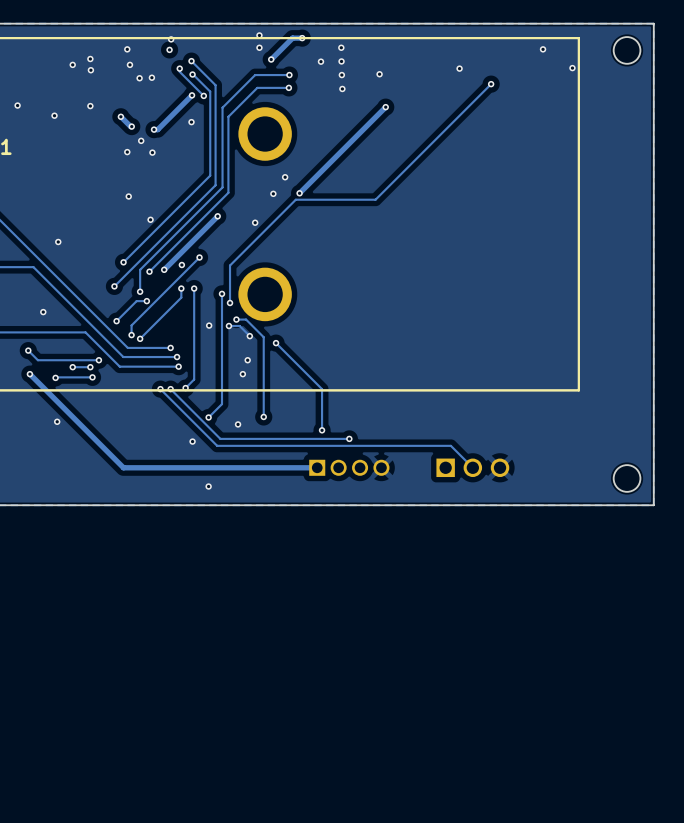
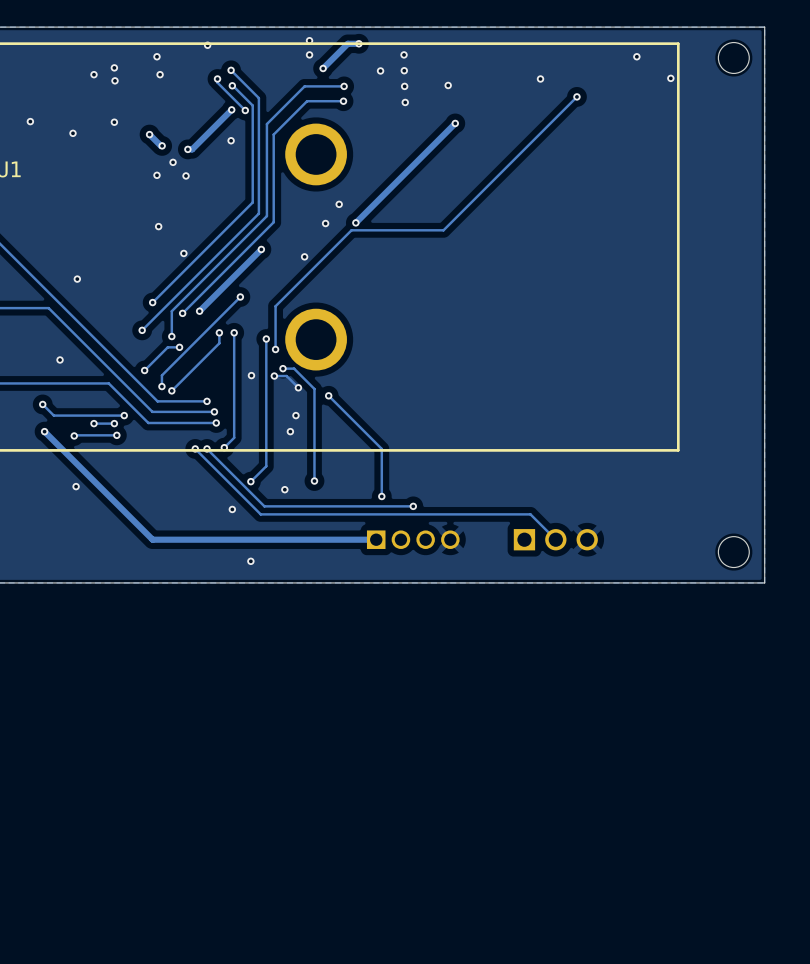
via: (169, 49) -> none
via: (151, 77) -> none
via: (139, 78) -> none
via: (181, 264) -> none

